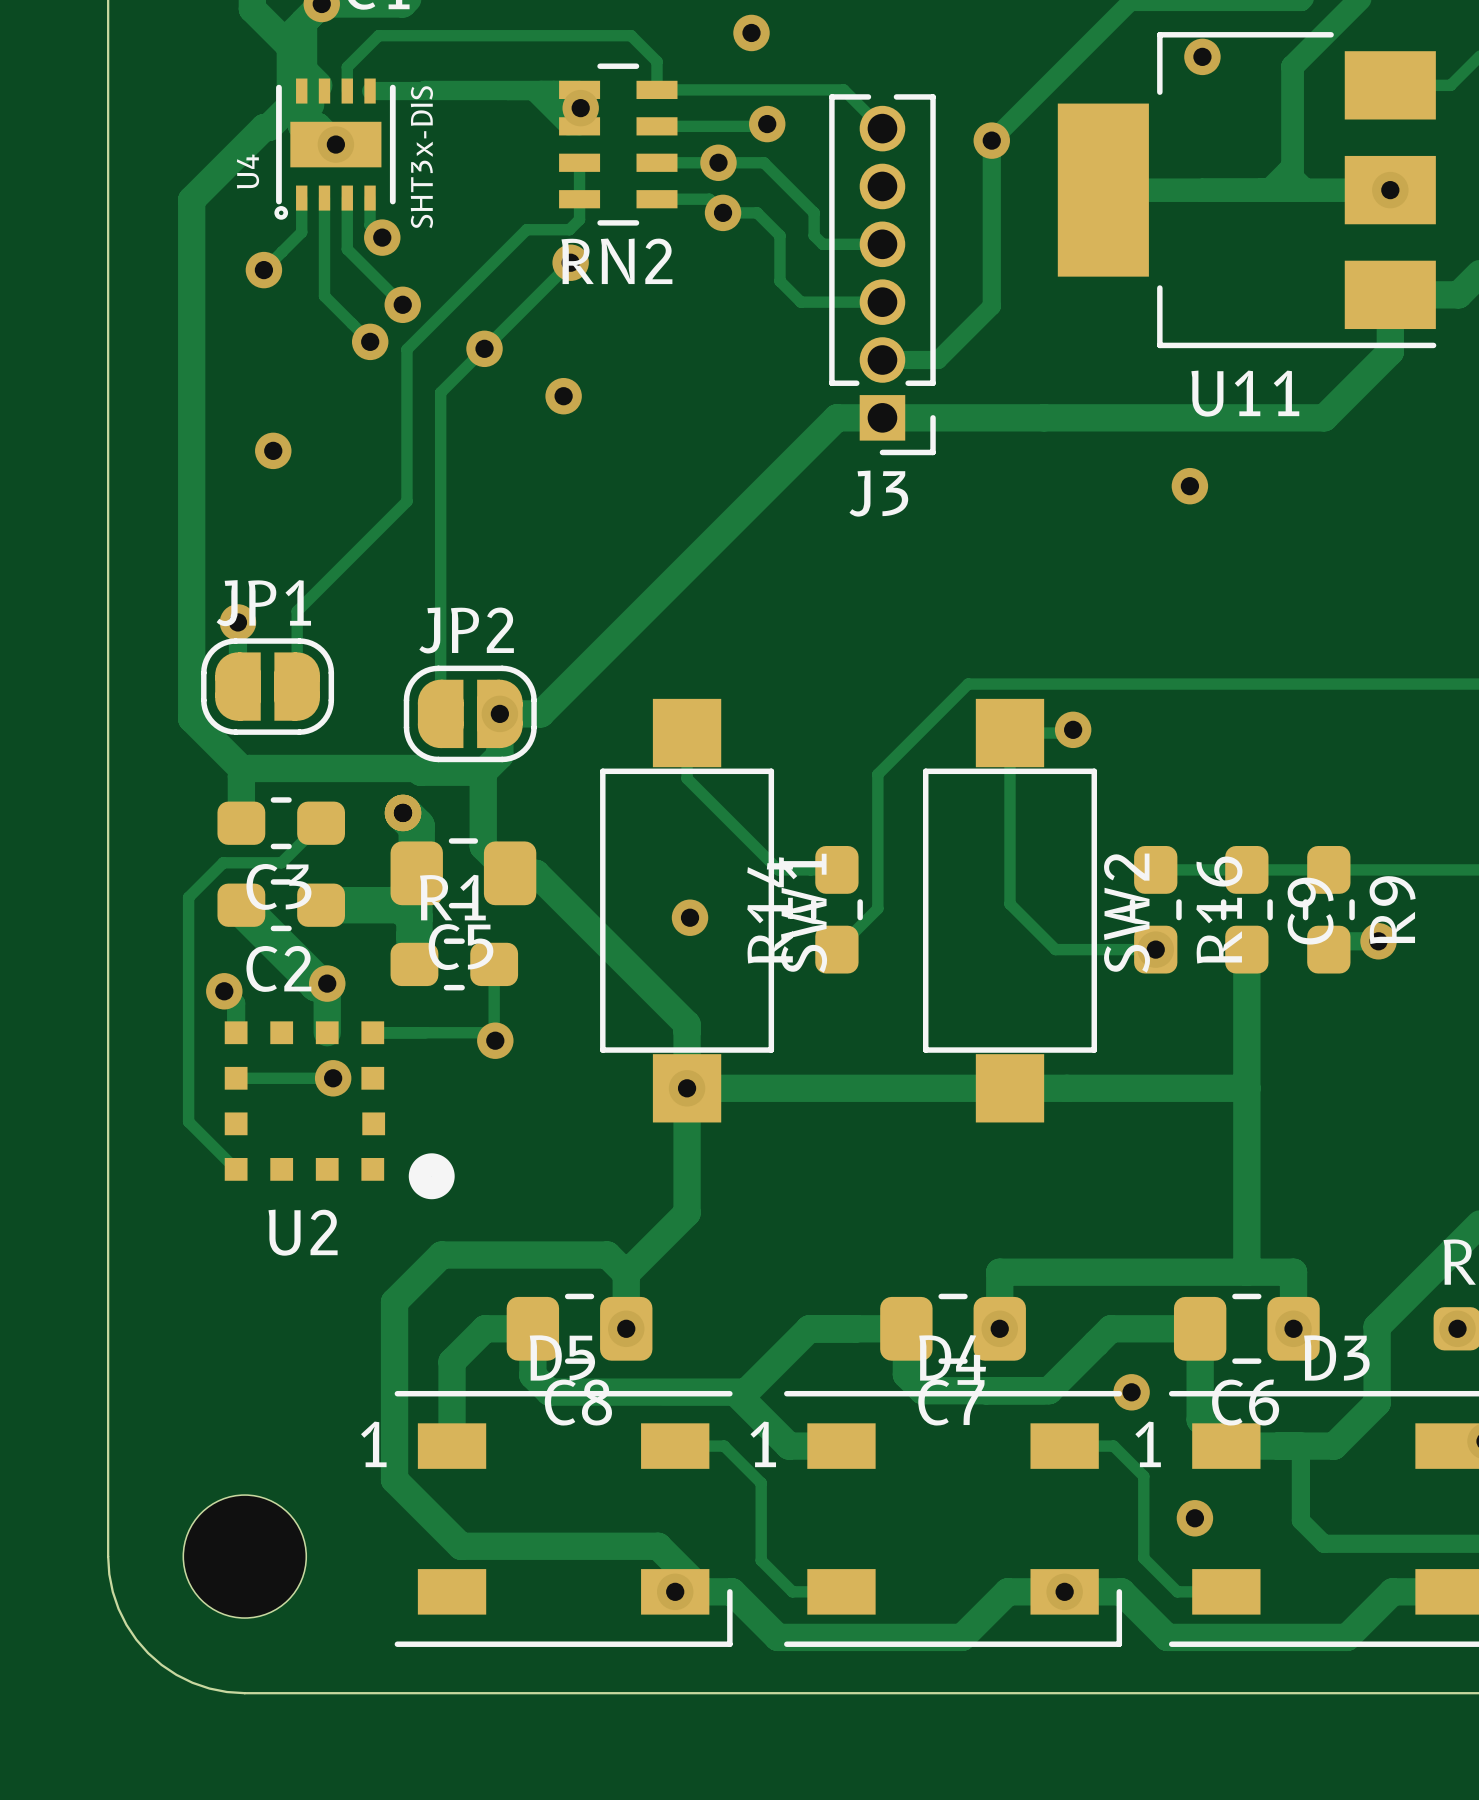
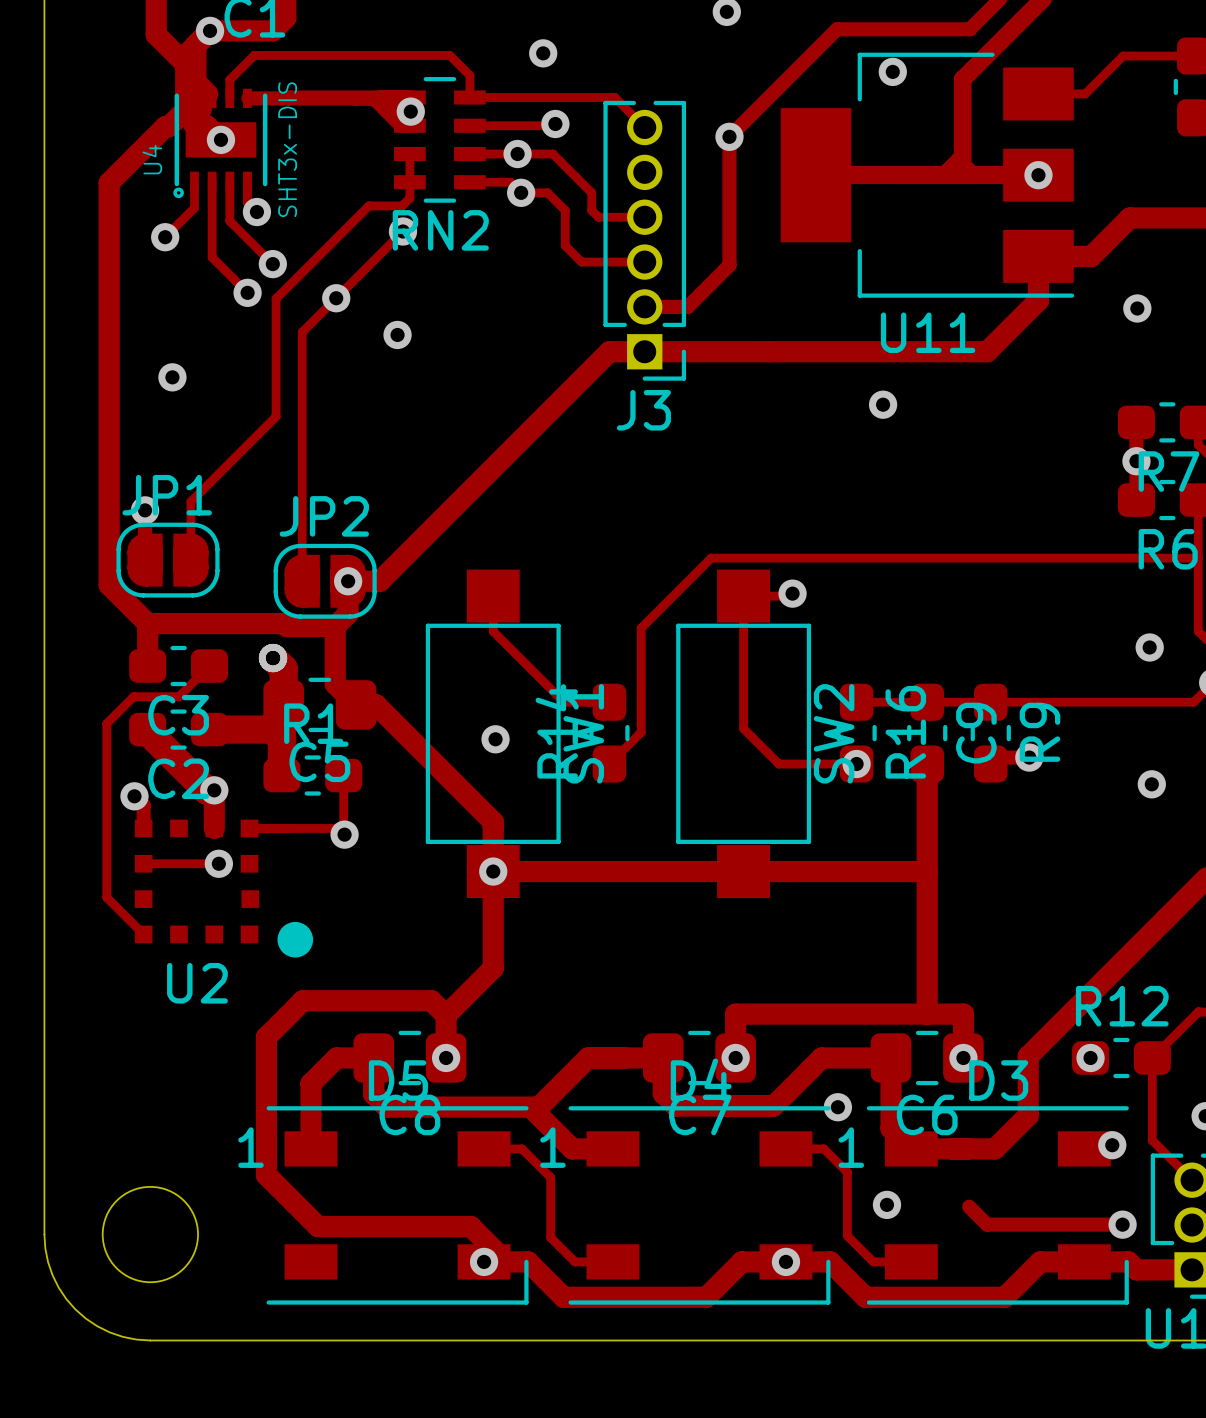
track: (1300, 1446) (1300, 1520) -> none

